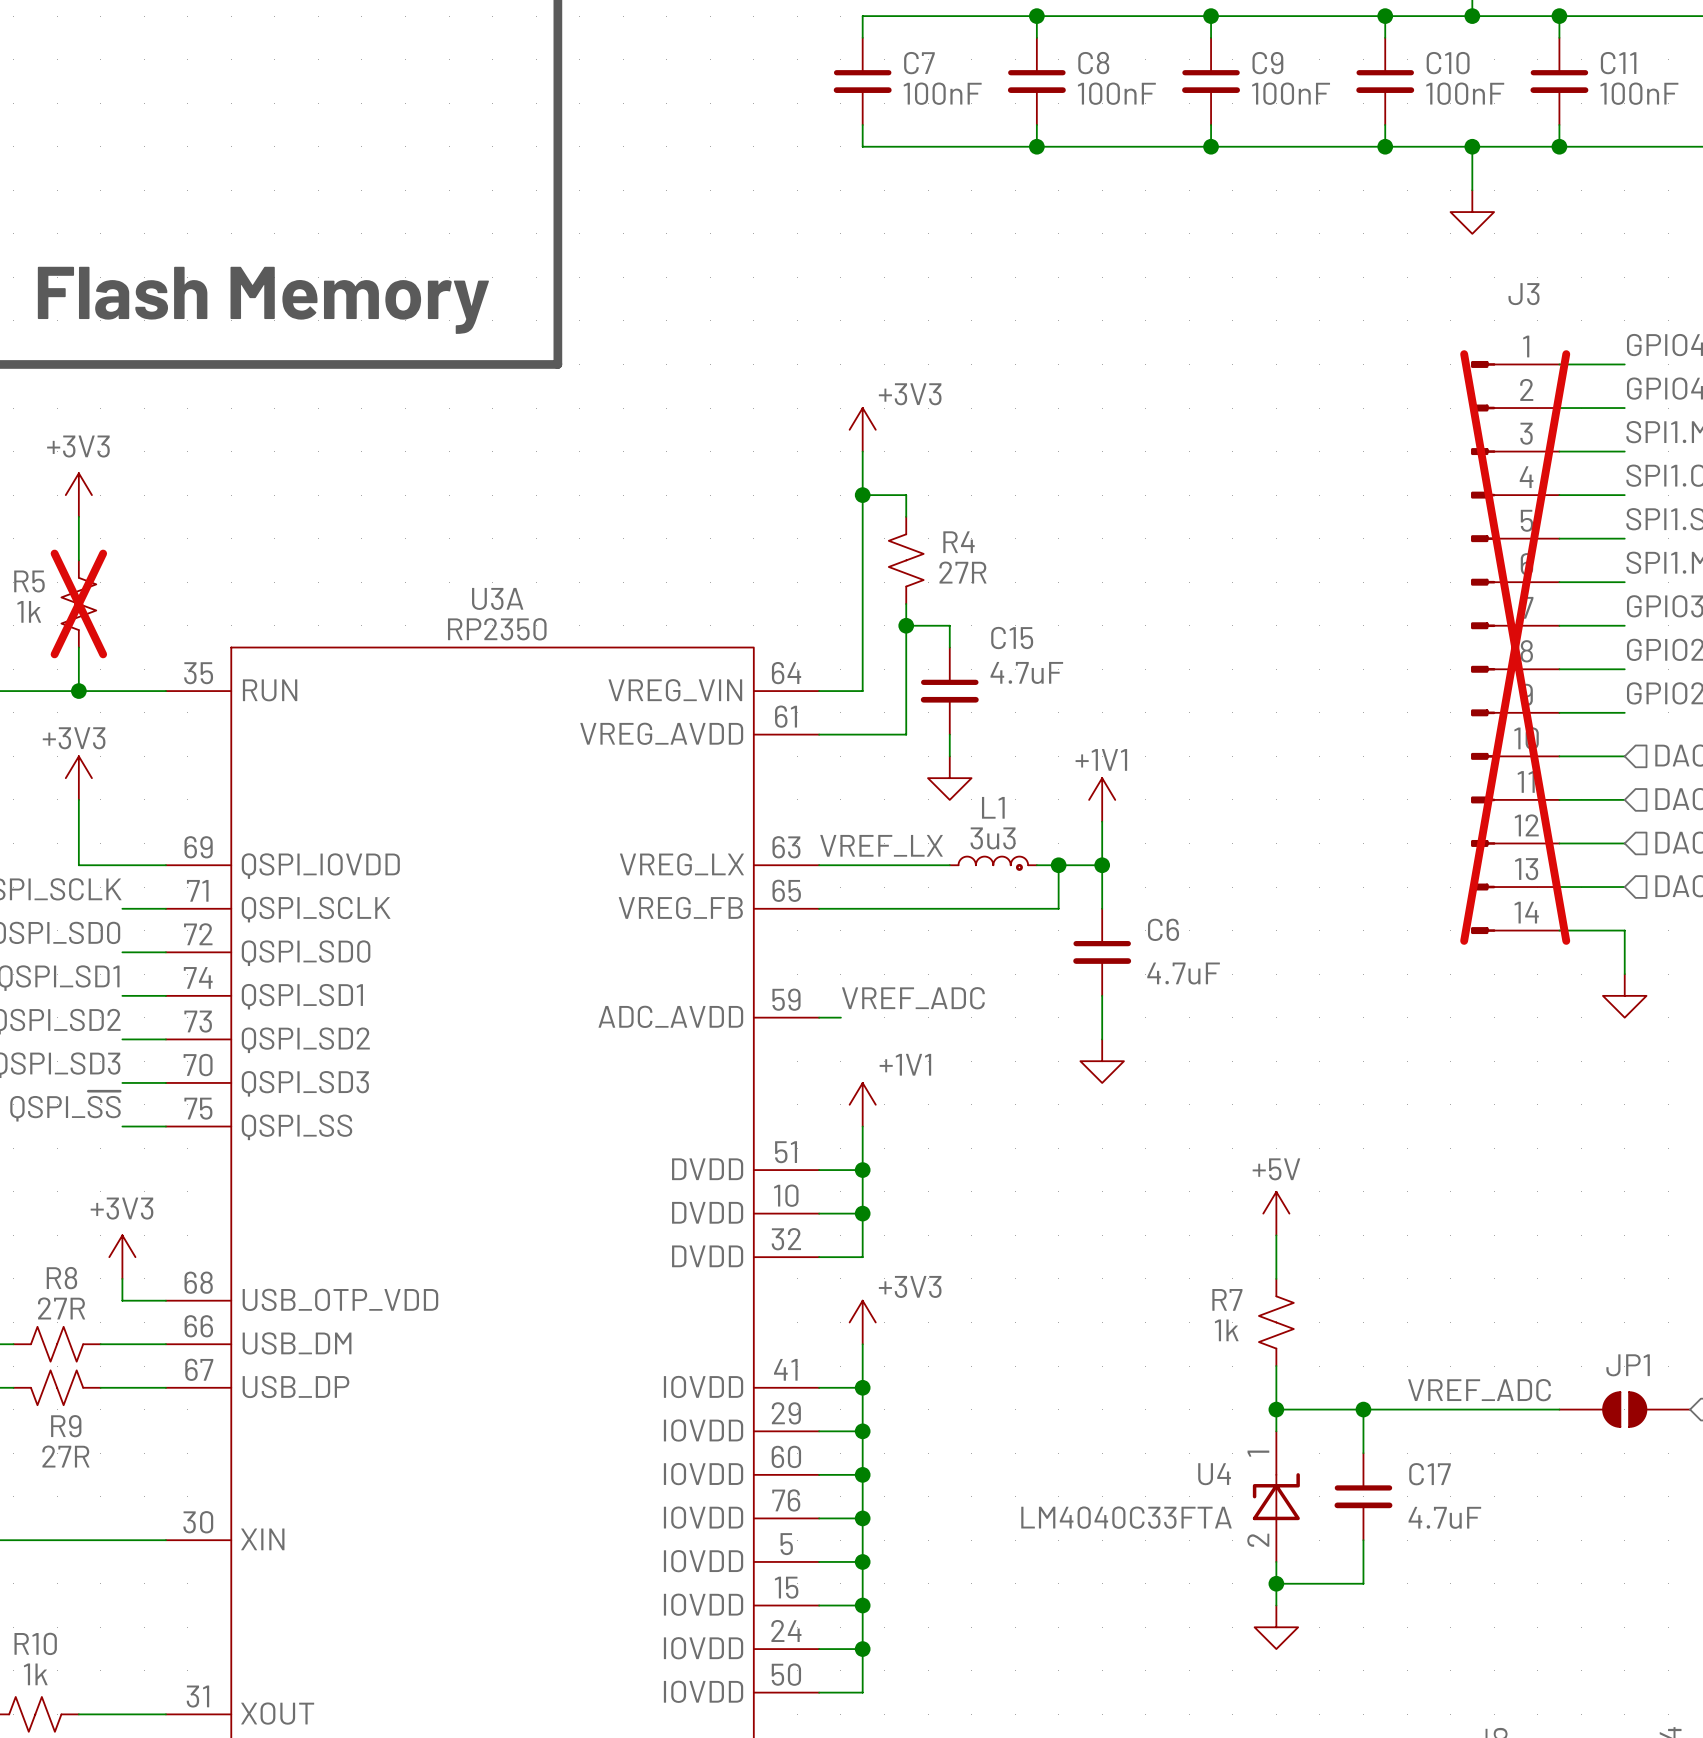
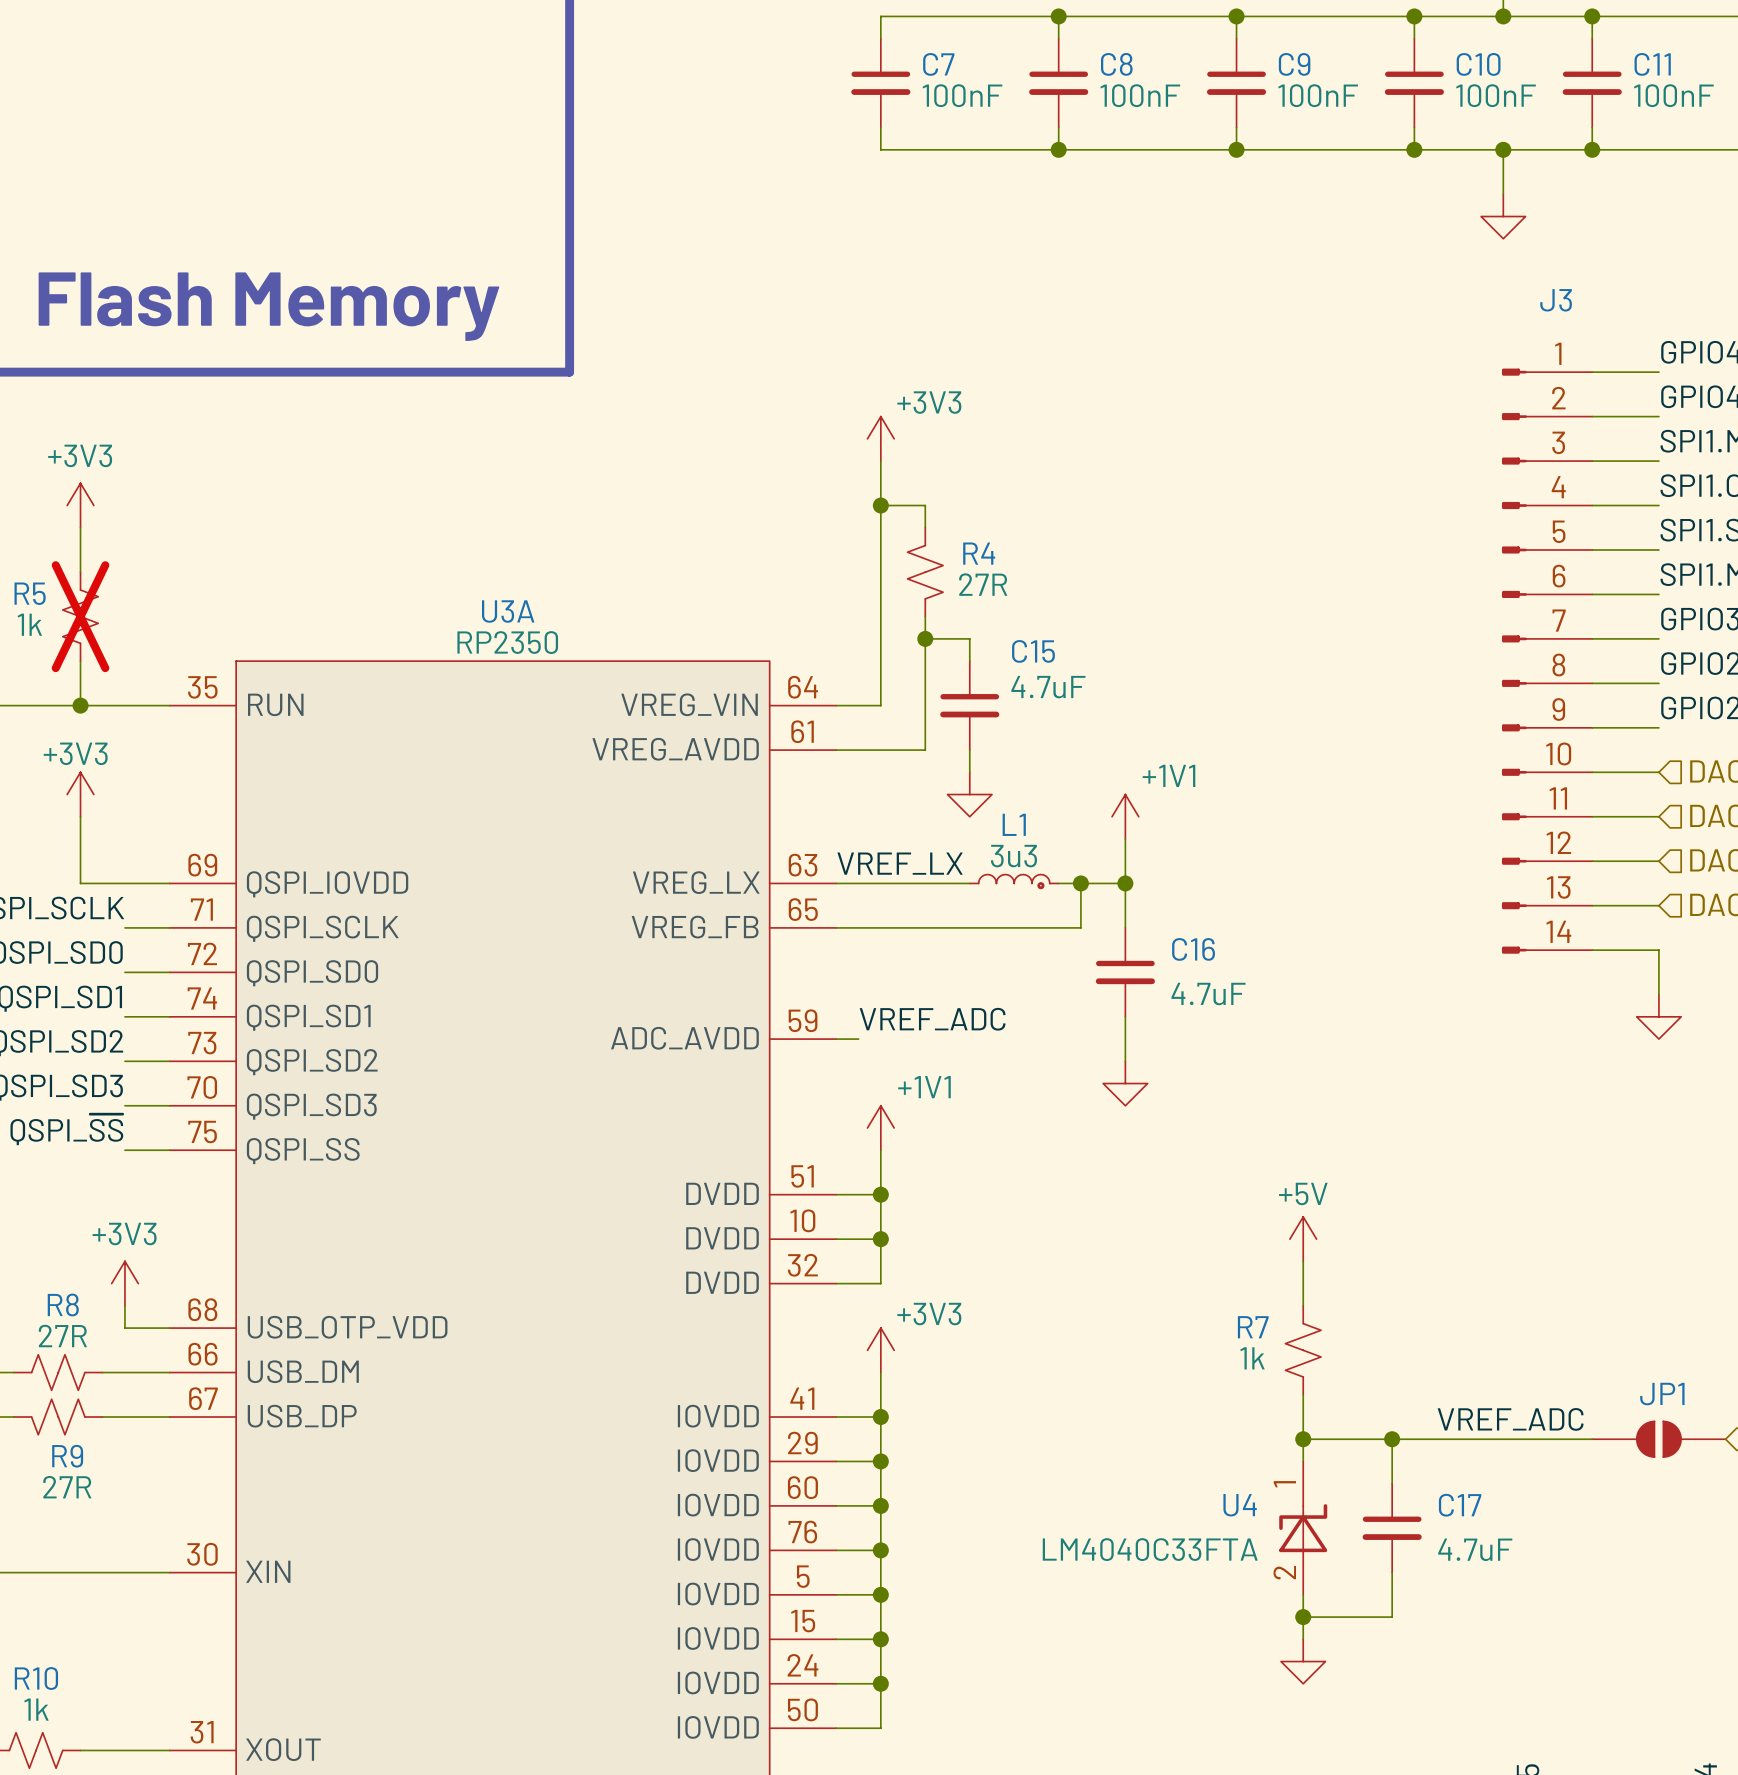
J3 do-not-place cross: (1515, 647) -> none
power symbol text position: +1V1 (1101, 759) -> +1V1 (1168, 775)
C6 name: C6 (1163, 929) -> C16 (1193, 949)

